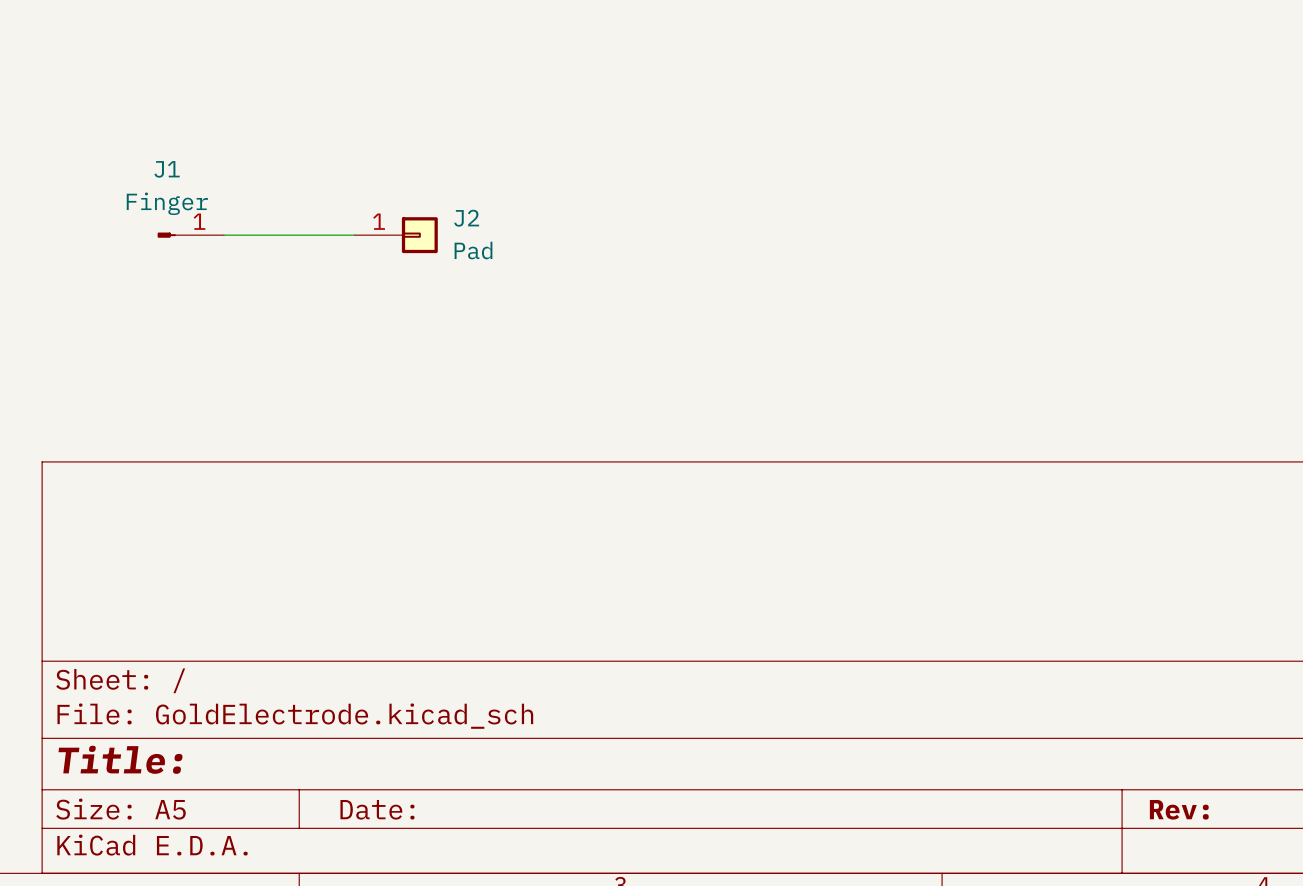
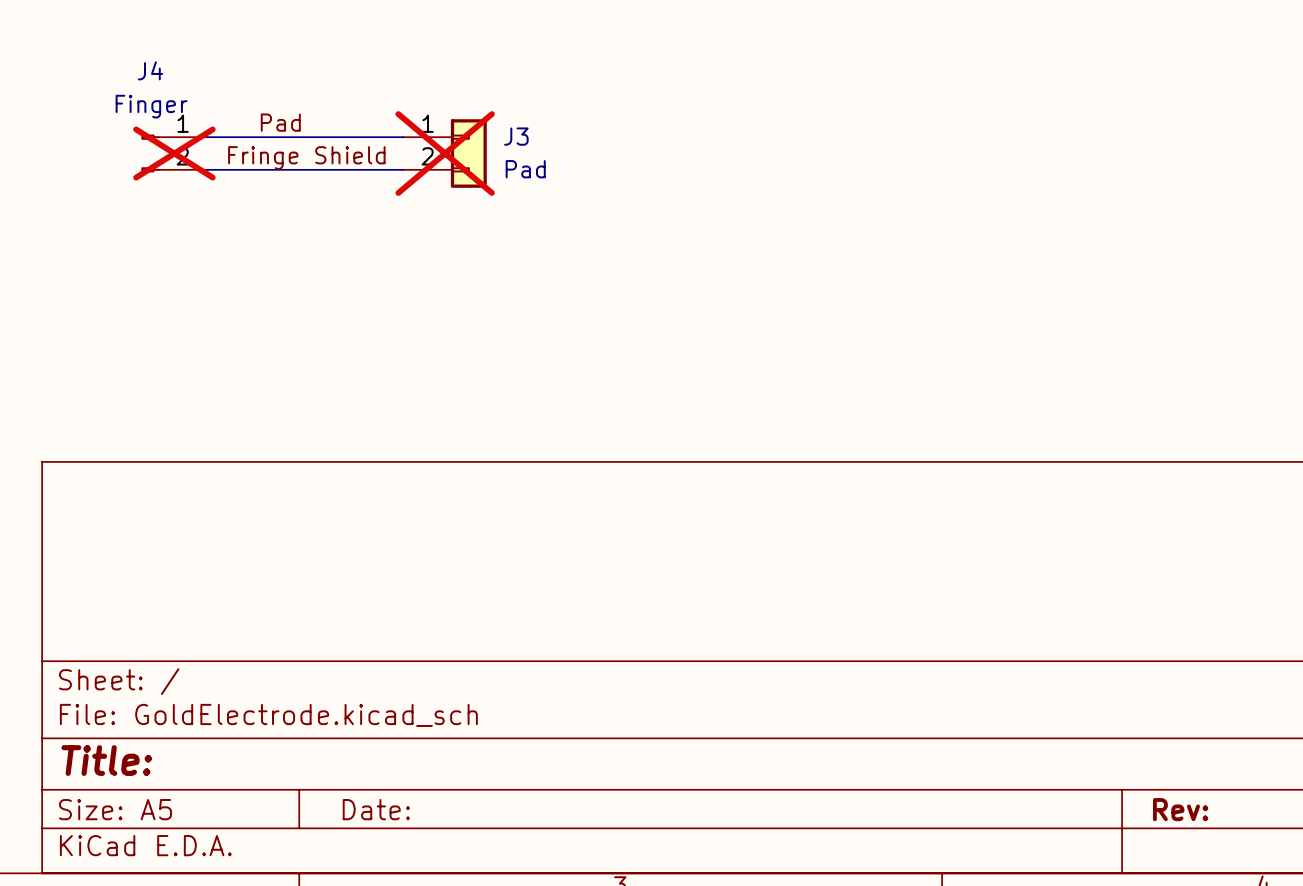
label: none -> Pad (280, 122)
wire: none -> (207, 137) (403, 137)
J4: none -> Finger (174, 153)
J3: none -> Pad (445, 153)
label: none -> Fringe Shield (306, 157)
wire: none -> (207, 169) (403, 169)
J1: Finger (190, 235) -> none
wire: (223, 235) (354, 235) -> none
J2: Pad (396, 235) -> none

